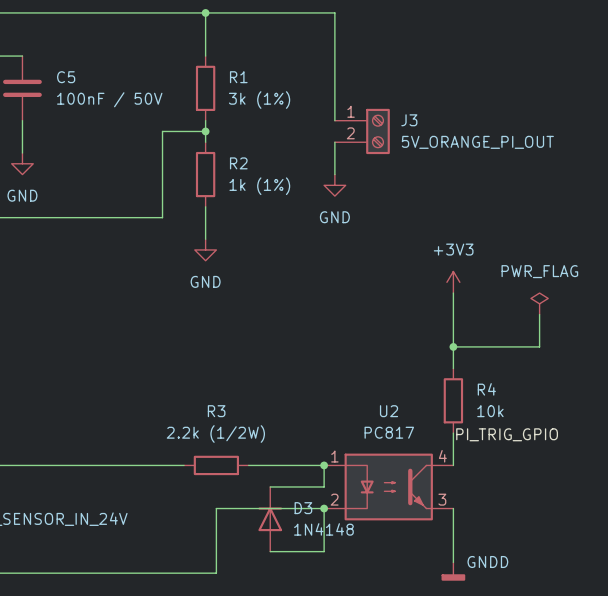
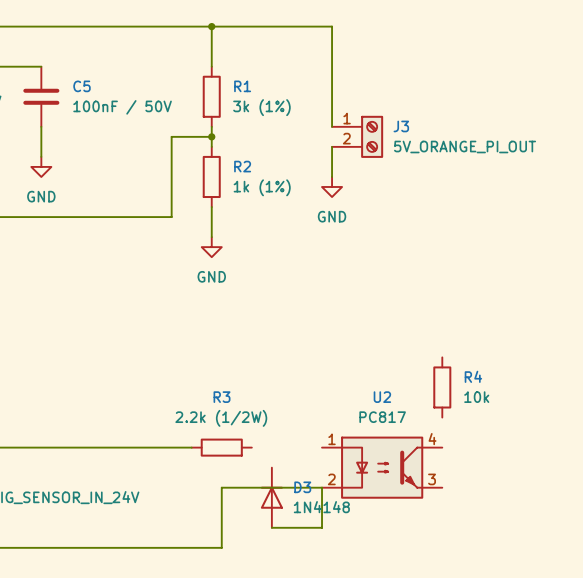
power symbol: +3V3 (453, 282) -> none
wire: (453, 293) (453, 368) -> none
power symbol: PWR_FLAG (539, 303) -> none
wire: (539, 314) (539, 346) (453, 346) -> none
junction: (453, 346) -> none
wire: (453, 433) (453, 465) -> none
label: PI_TRIG_GPIO (507, 434) -> none
wire: (248, 465) (324, 465) (324, 486) (270, 486) -> none
junction: (324, 465) -> none
junction: (324, 508) -> none
wire: (453, 508) (453, 562) -> none
power symbol: GNDD (453, 571) -> none

